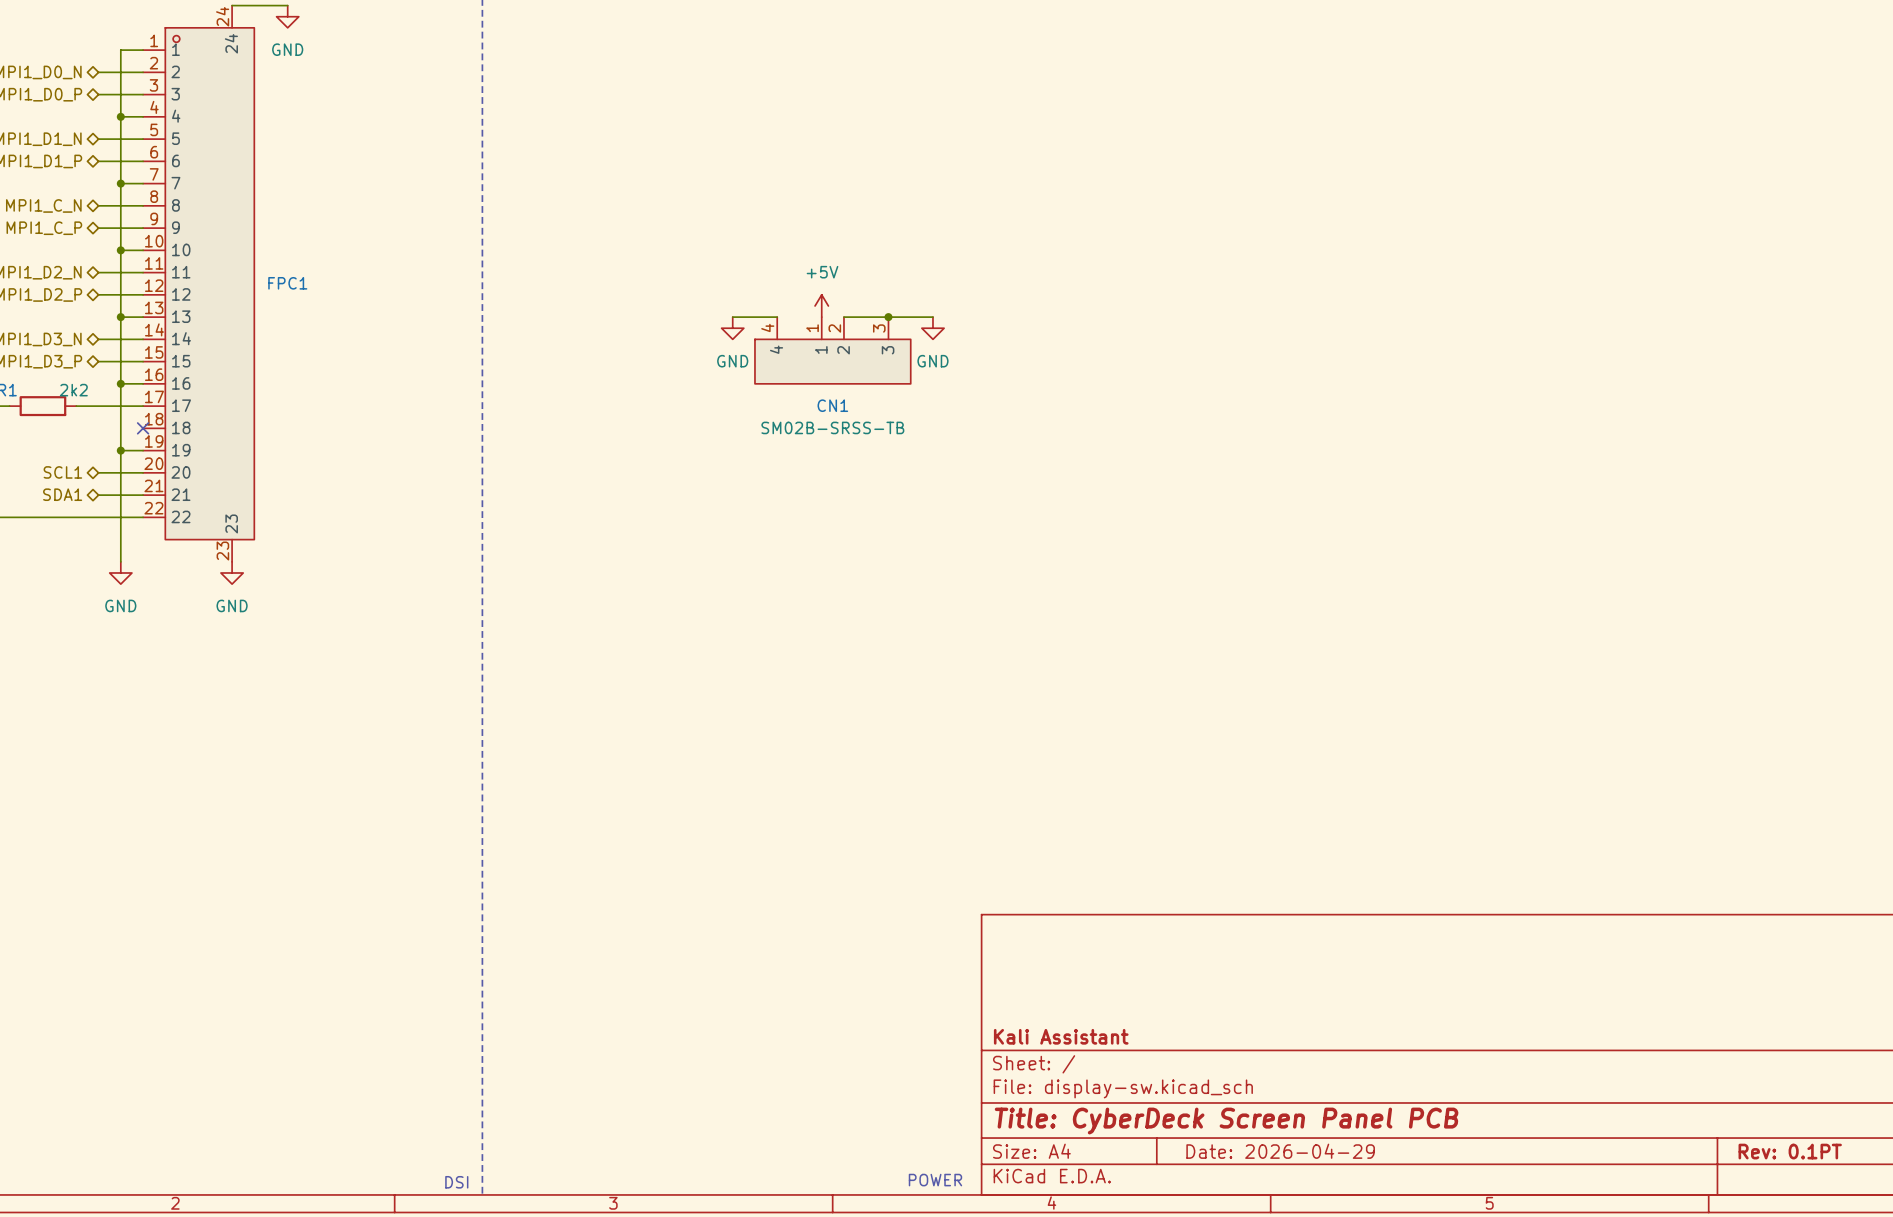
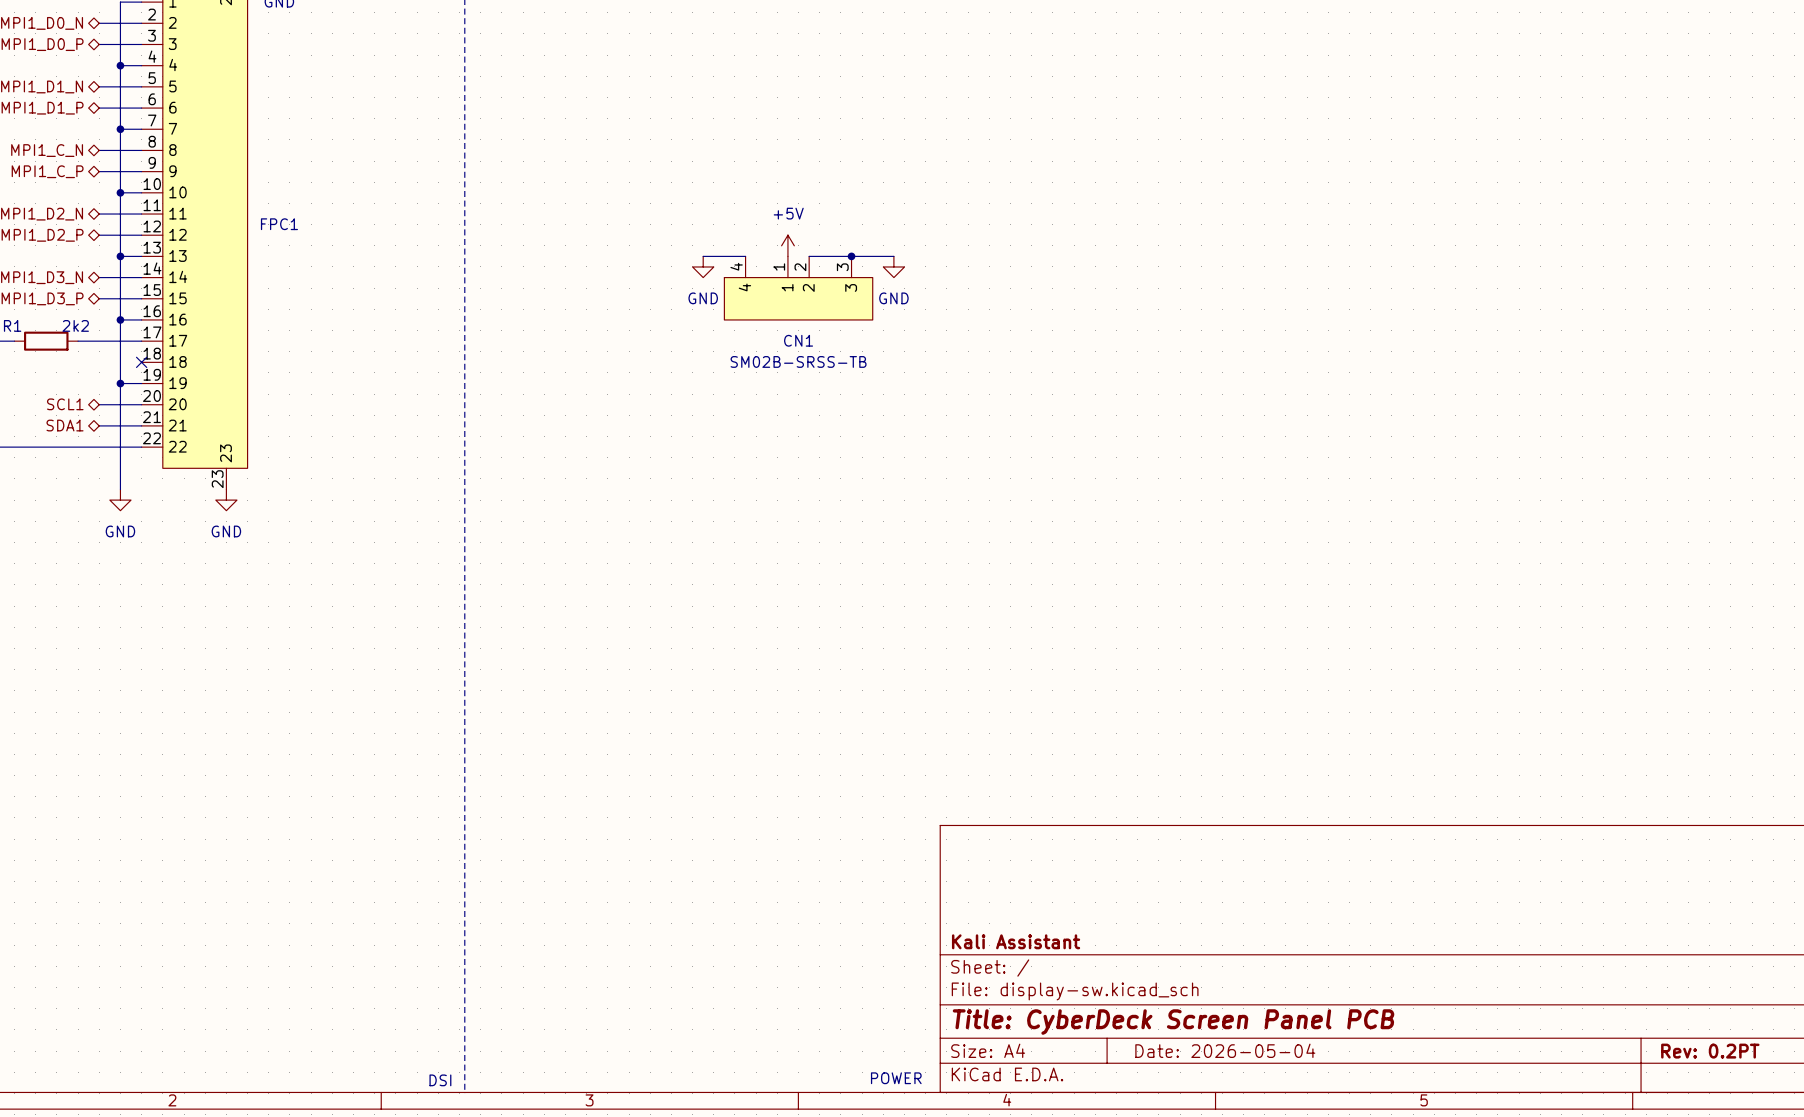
title block: Date: 2026-04-29 (1280, 1151) -> Date: 2026-05-04 (1225, 1050)
title block: Rev: 0.1PT (1790, 1151) -> Rev: 0.2PT (1710, 1051)

